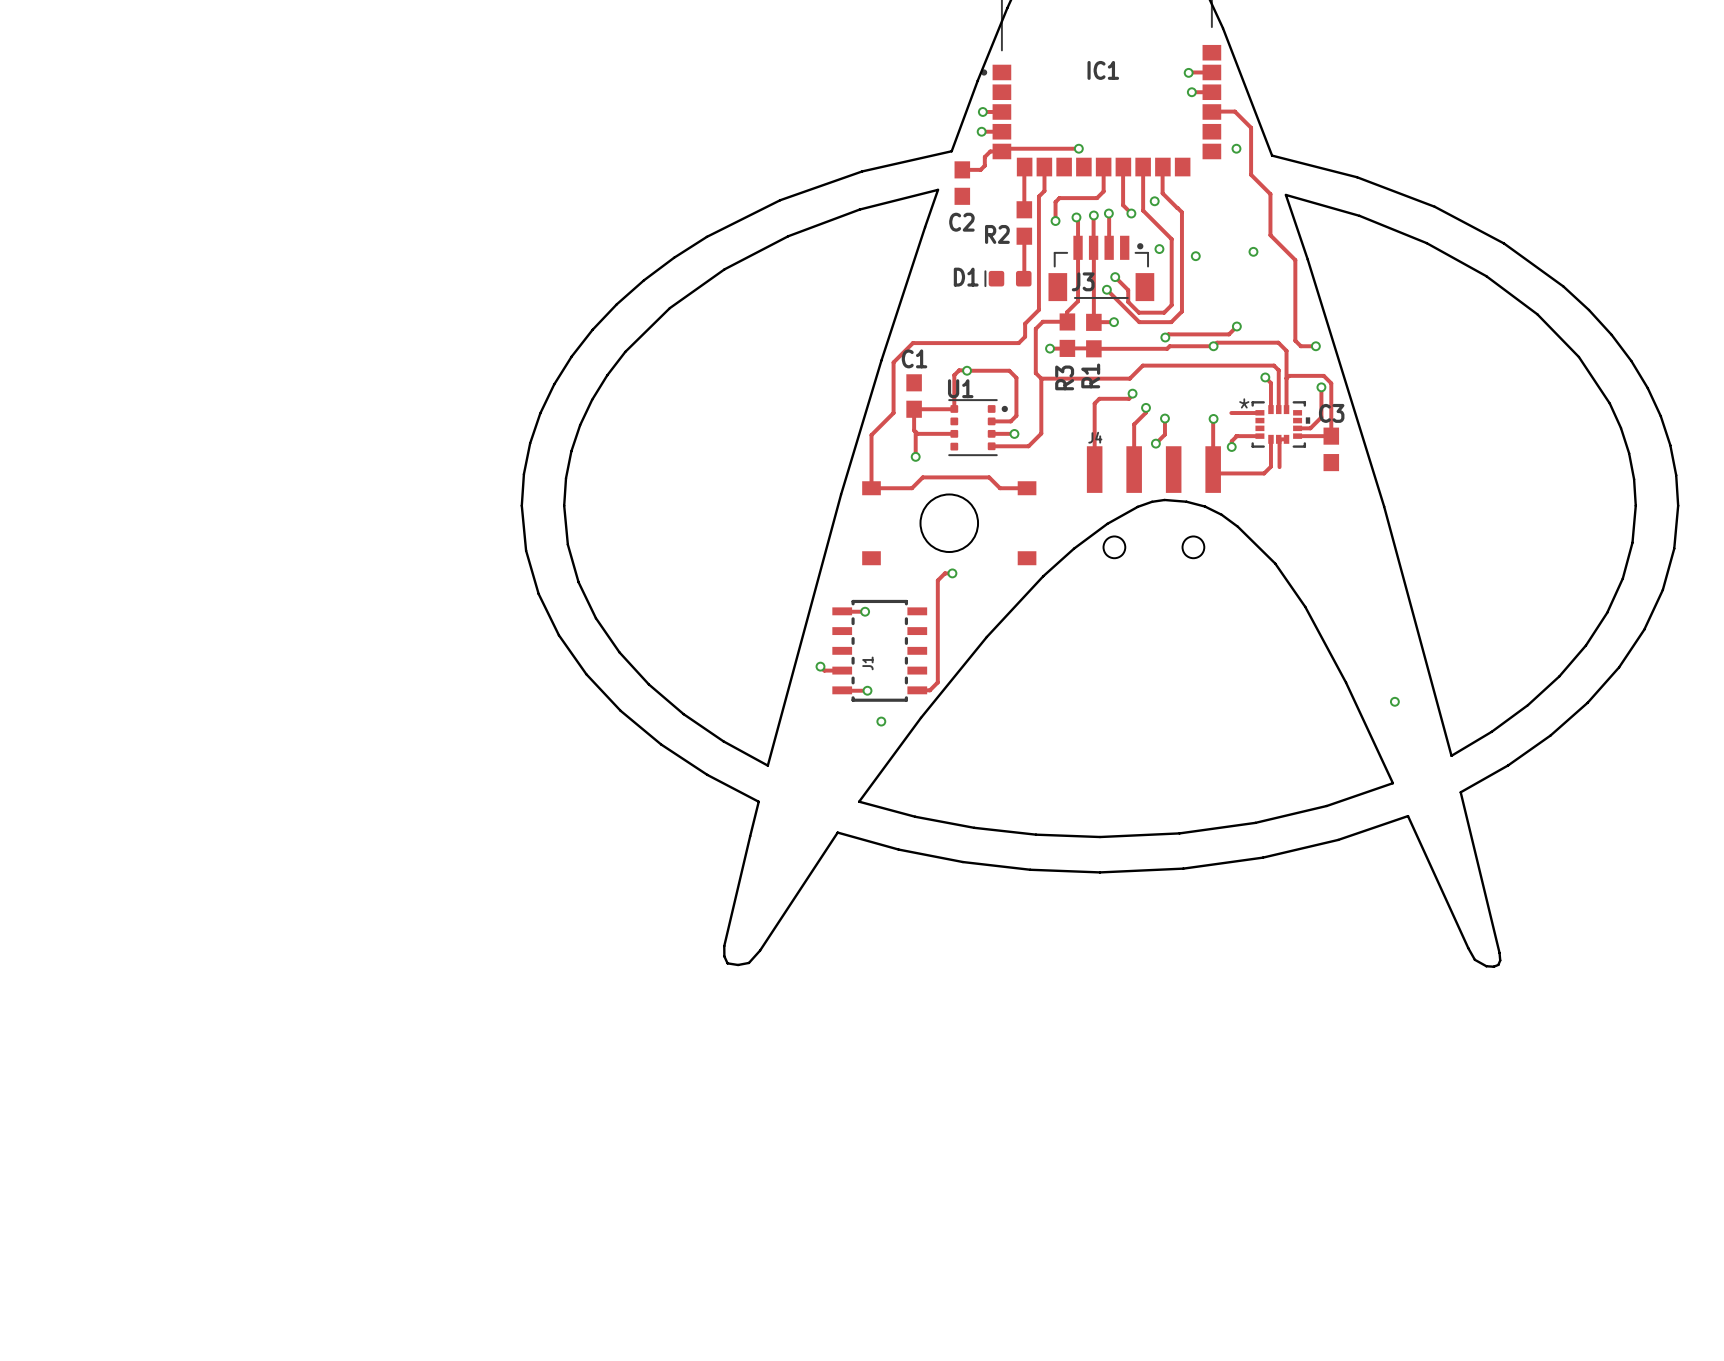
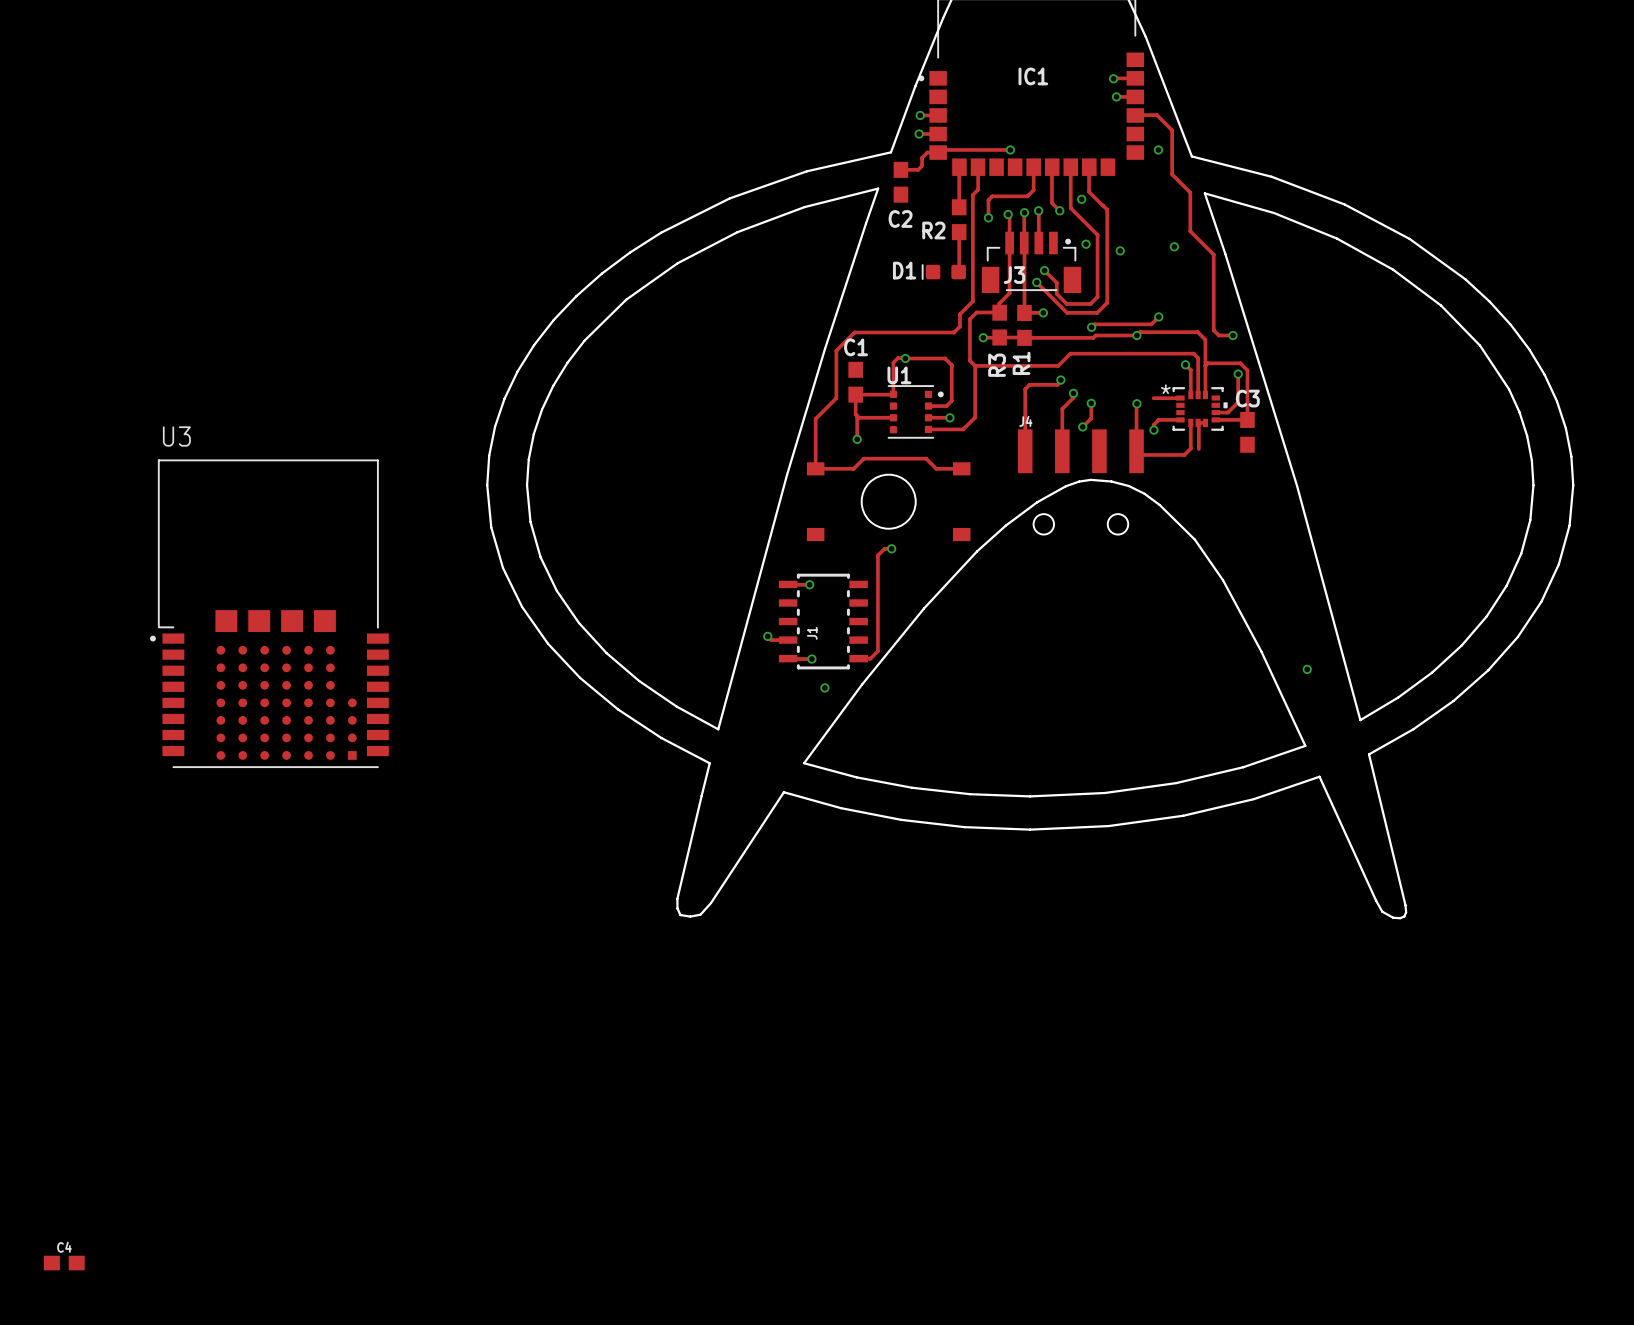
U3: none -> (269, 613)
C4: none -> (64, 1263)

